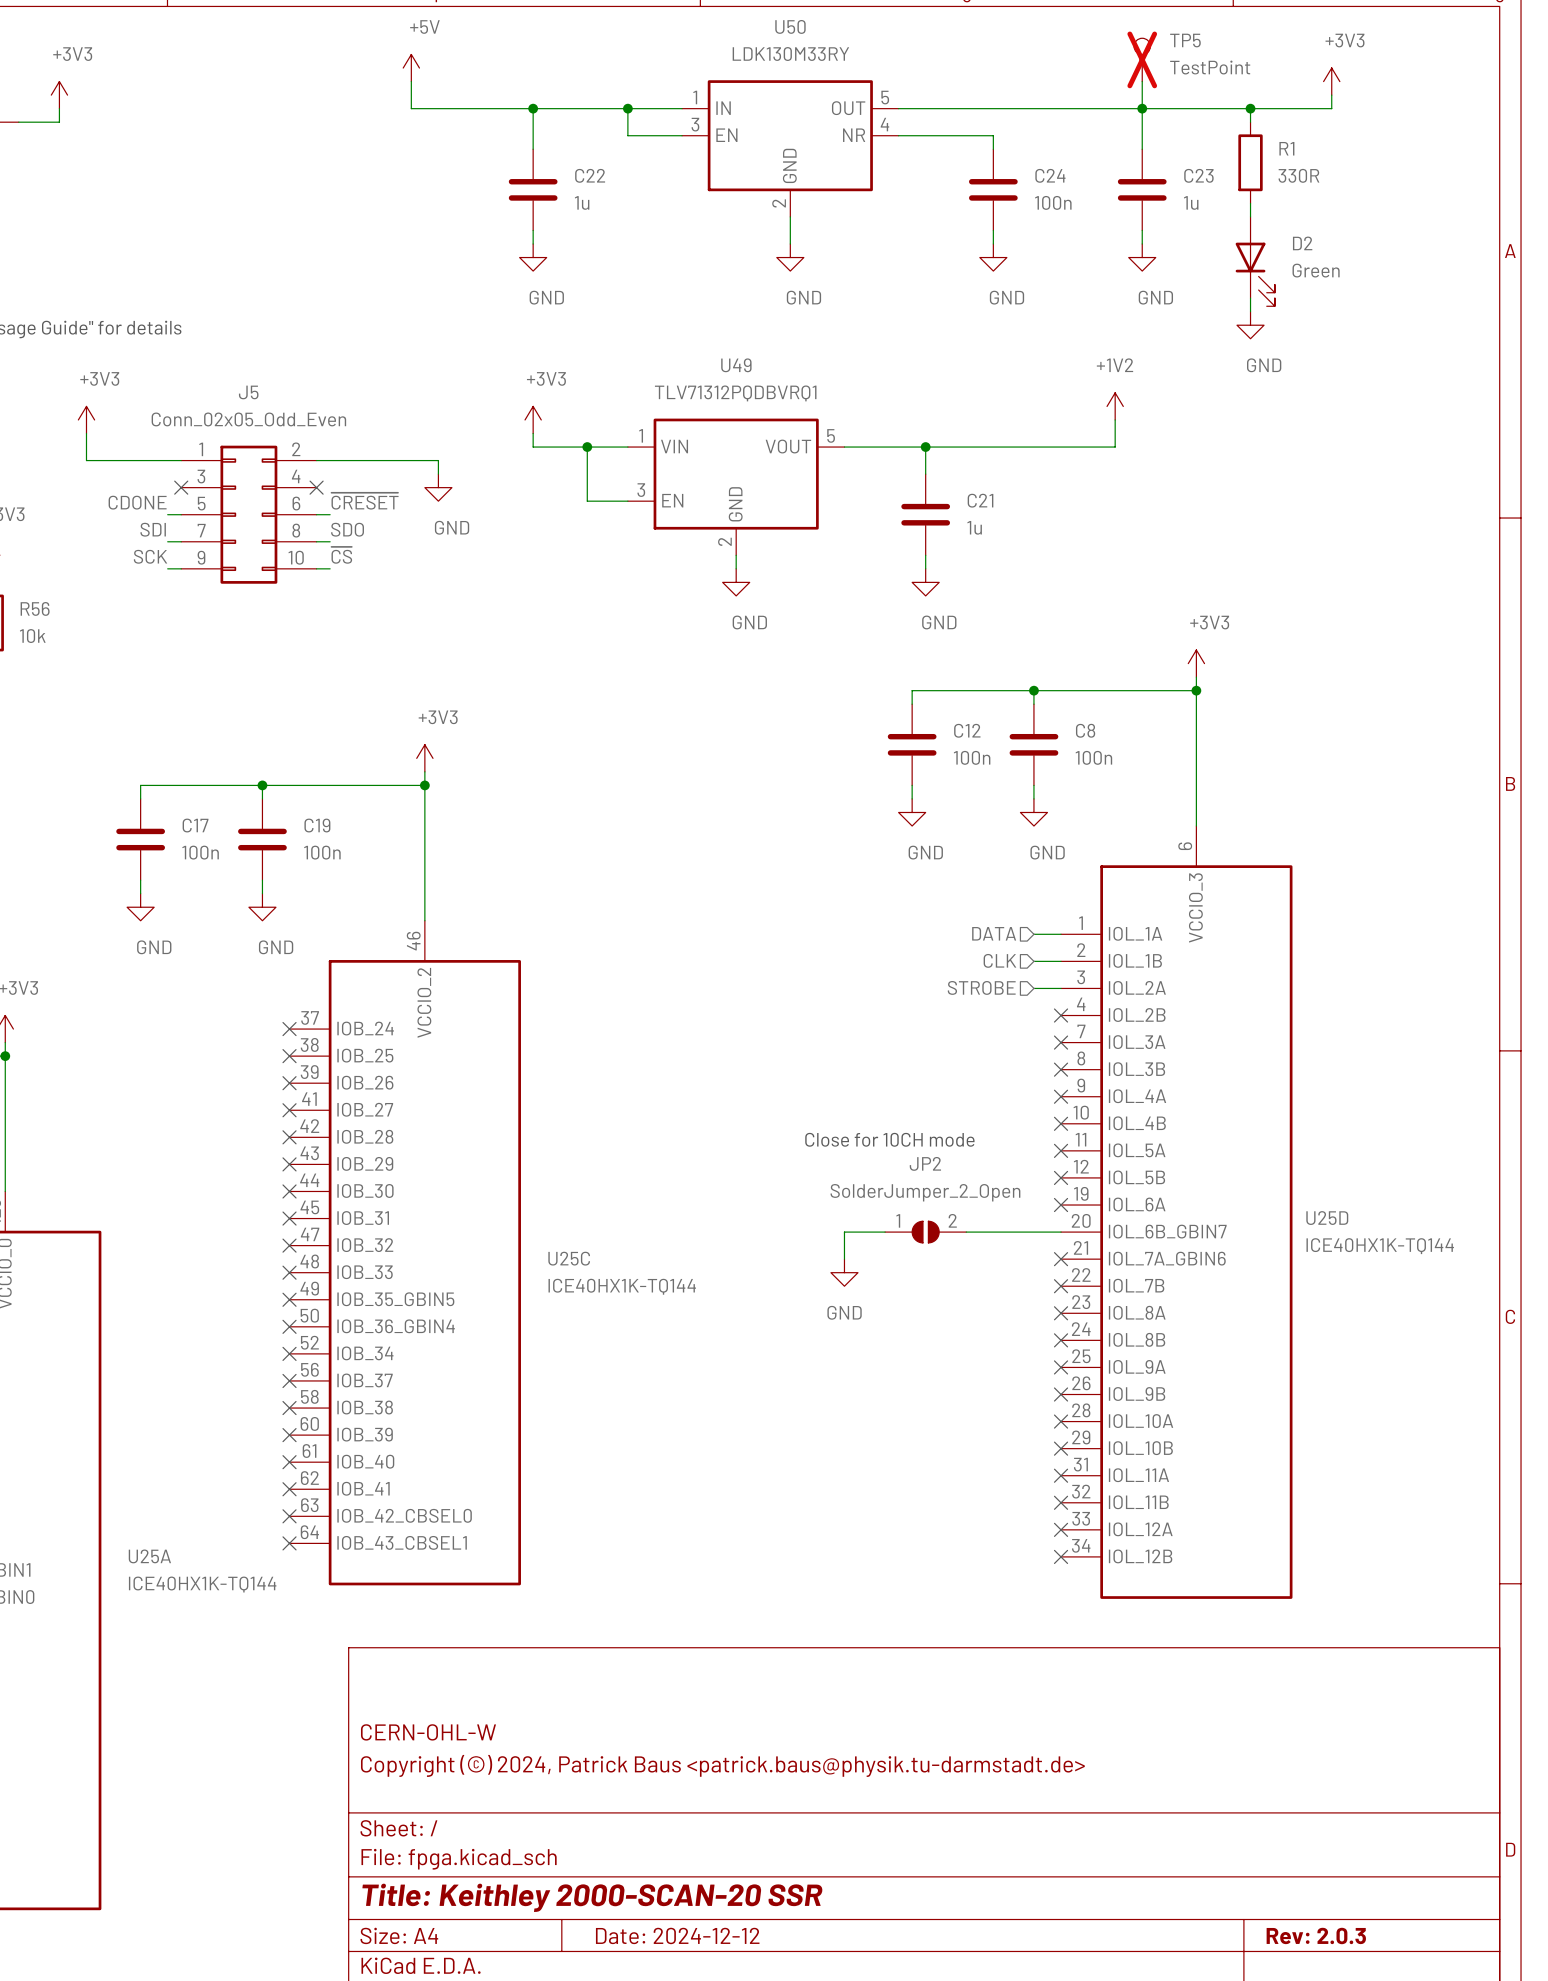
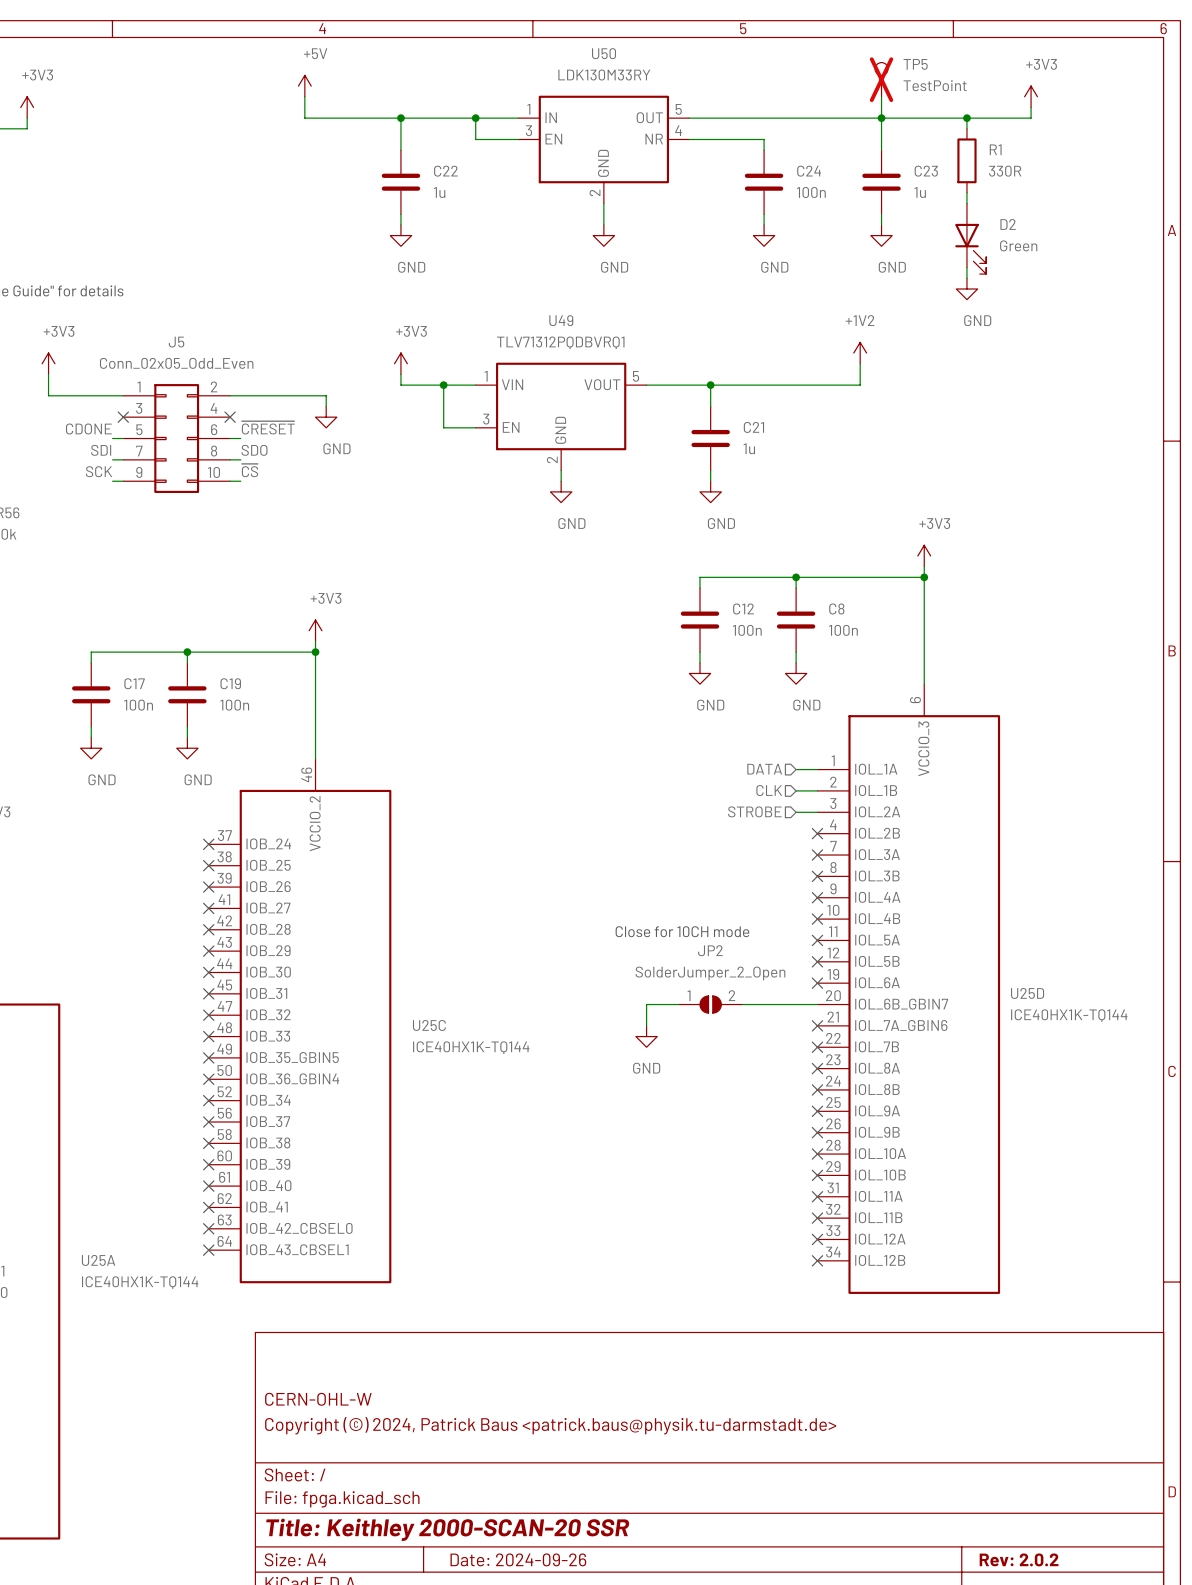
title block: Date: 2024-12-12 (677, 1935) -> Date: 2024-09-26 (518, 1559)
title block: Rev: 2.0.3 (1316, 1935) -> Rev: 2.0.2 (1019, 1559)

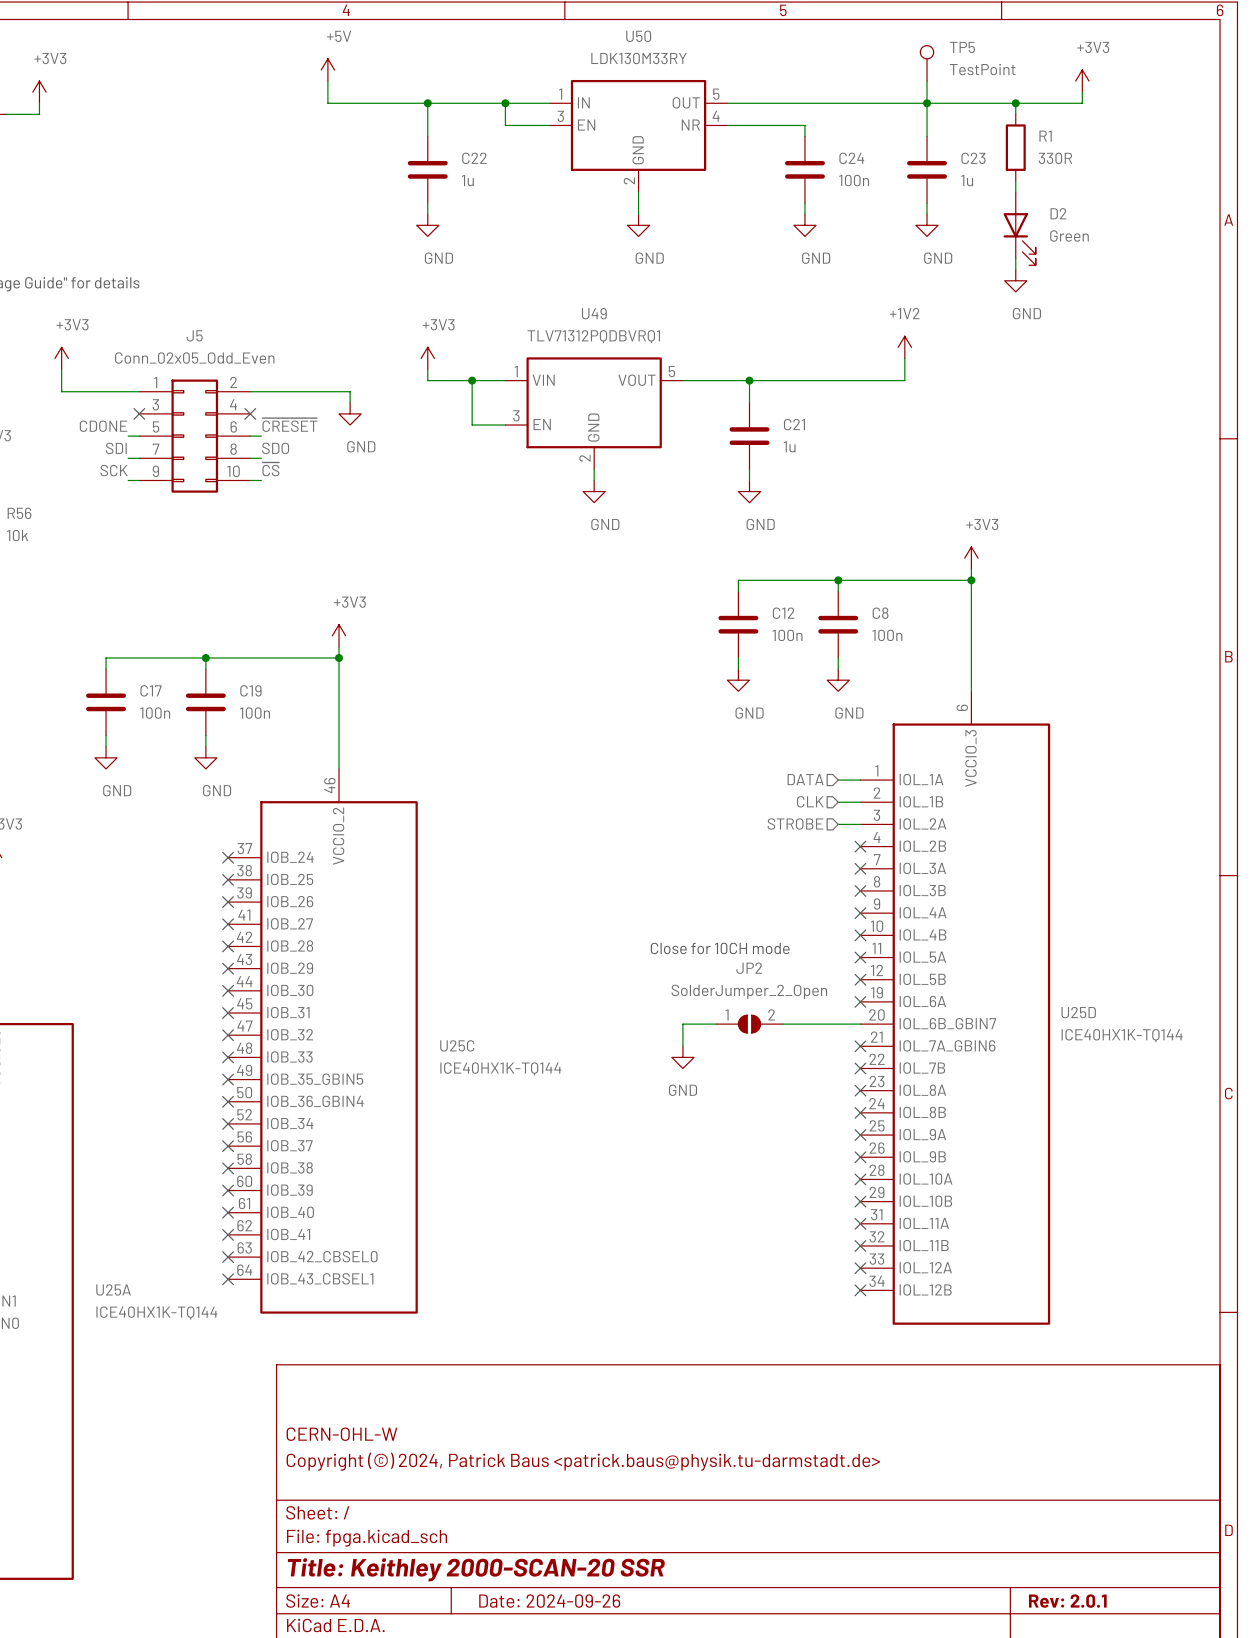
TP5 do-not-place cross: (881, 79) -> none
title block: Rev: 2.0.2 (1019, 1559) -> Rev: 2.0.1 (1067, 1601)

